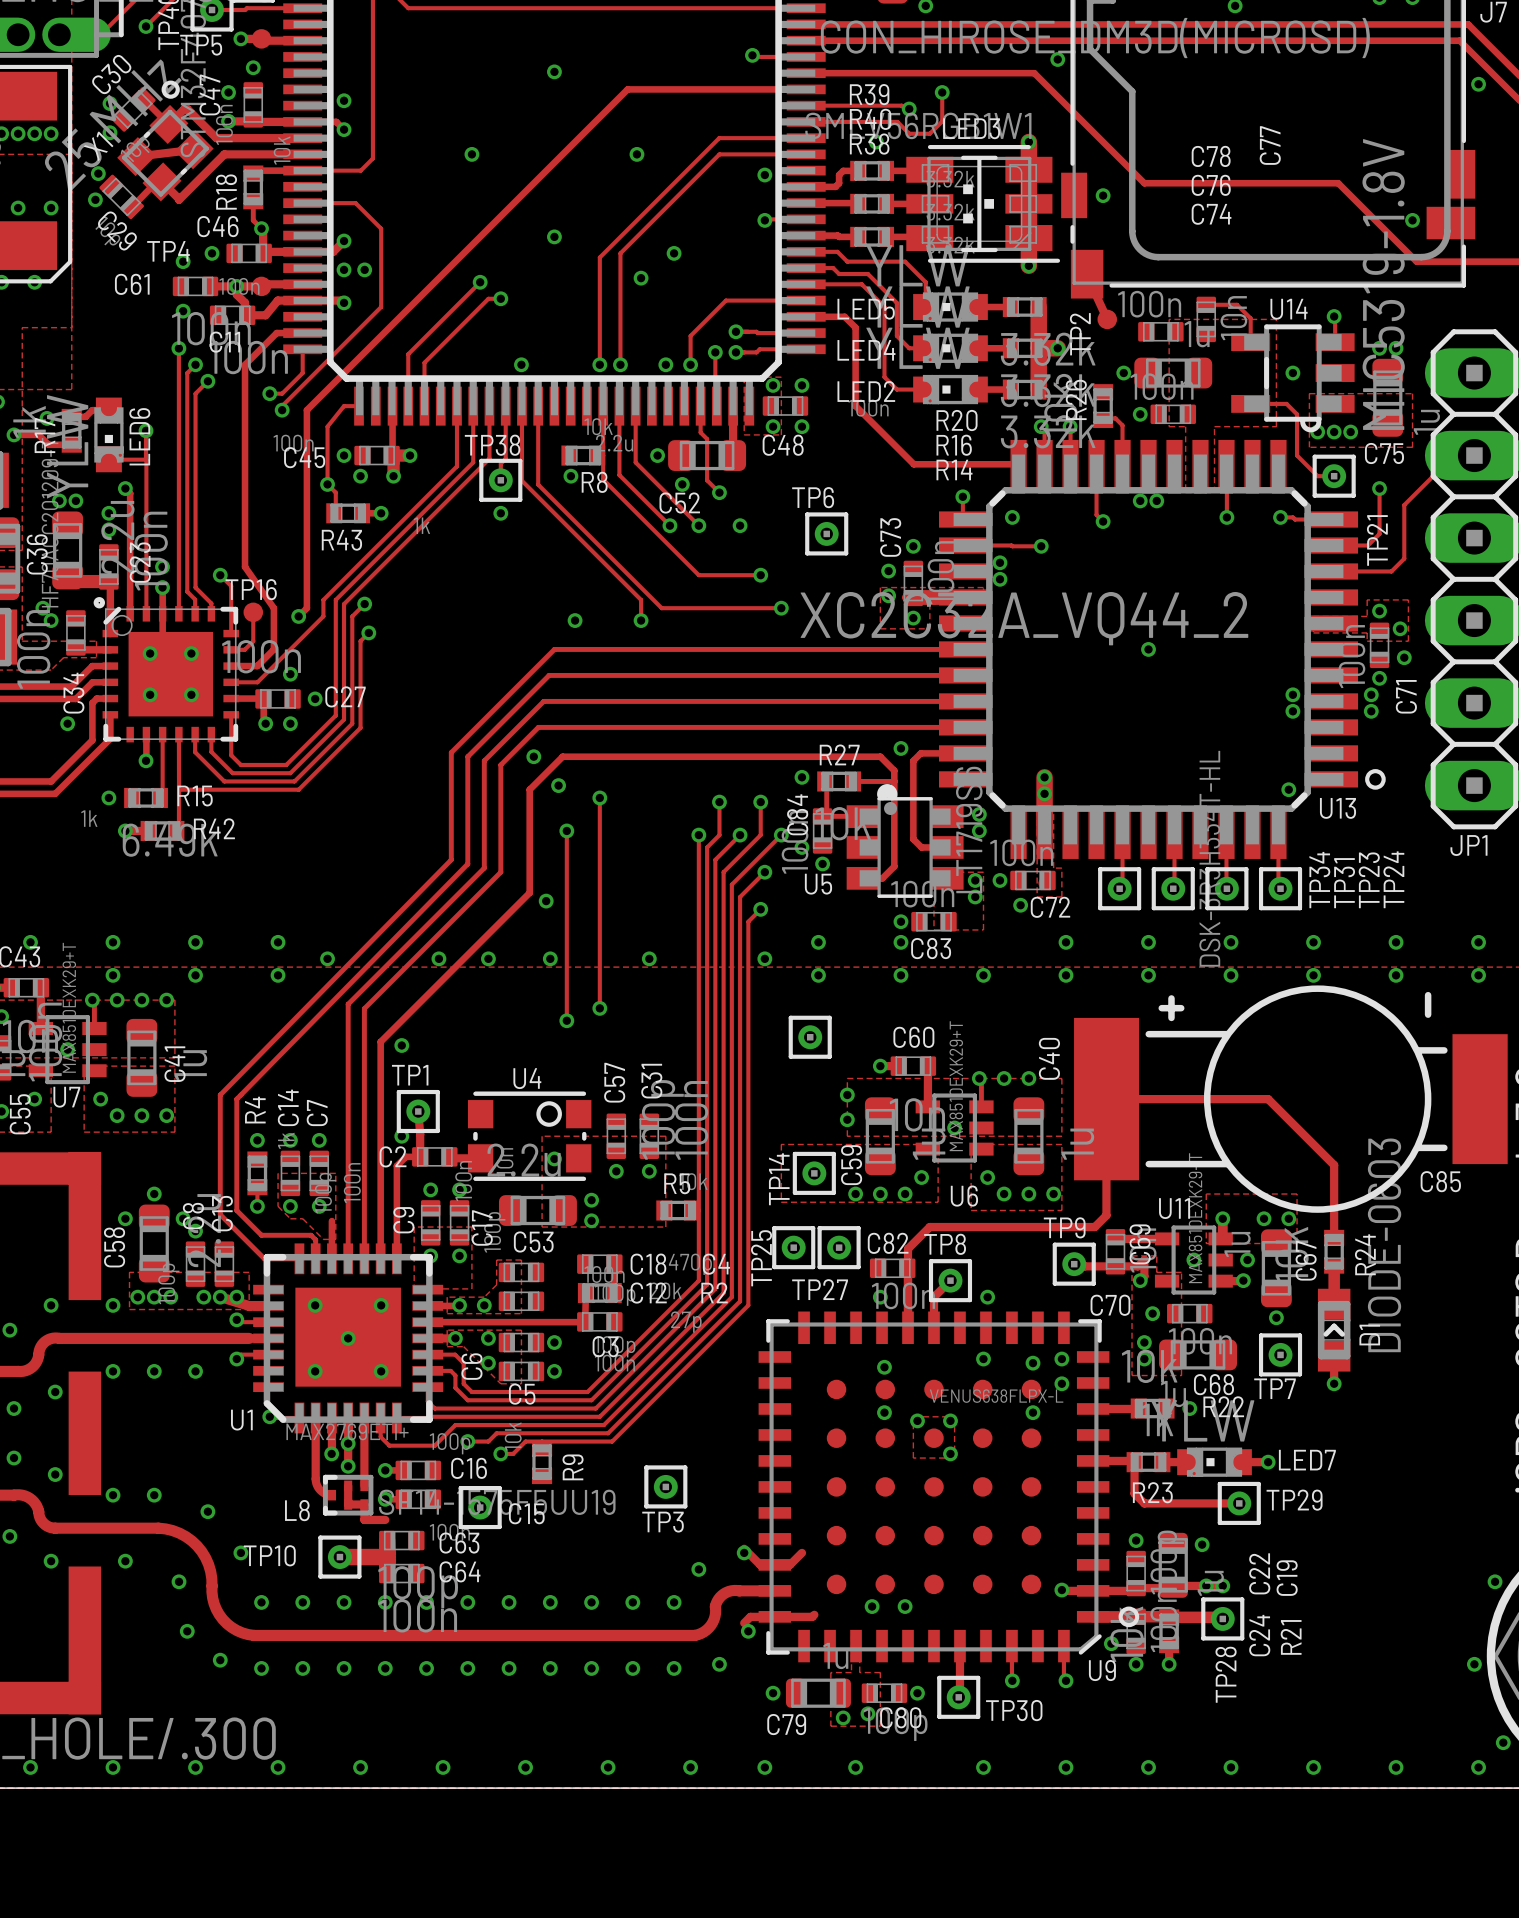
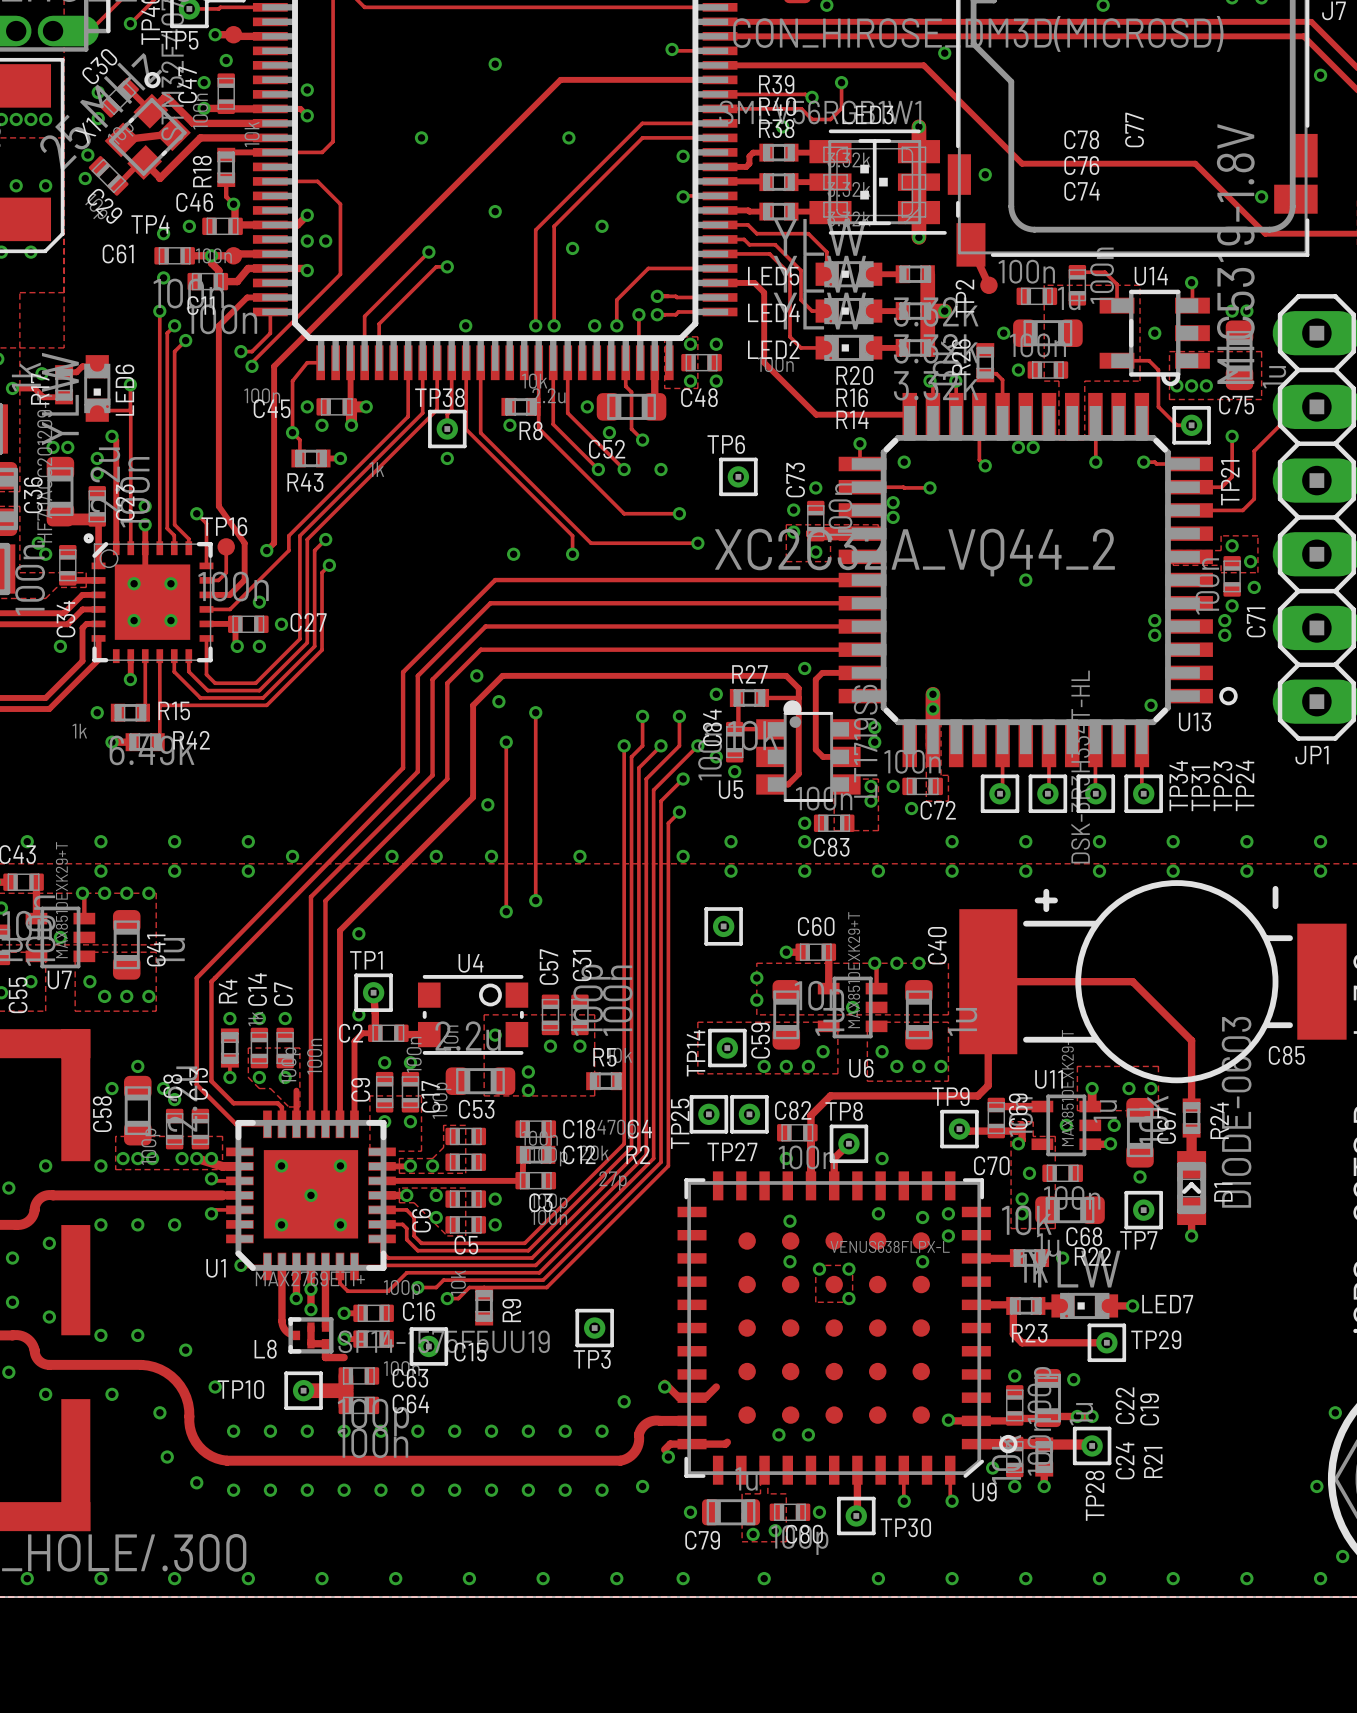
C77 value: 10n (1233, 318) -> 100n (1102, 275)

